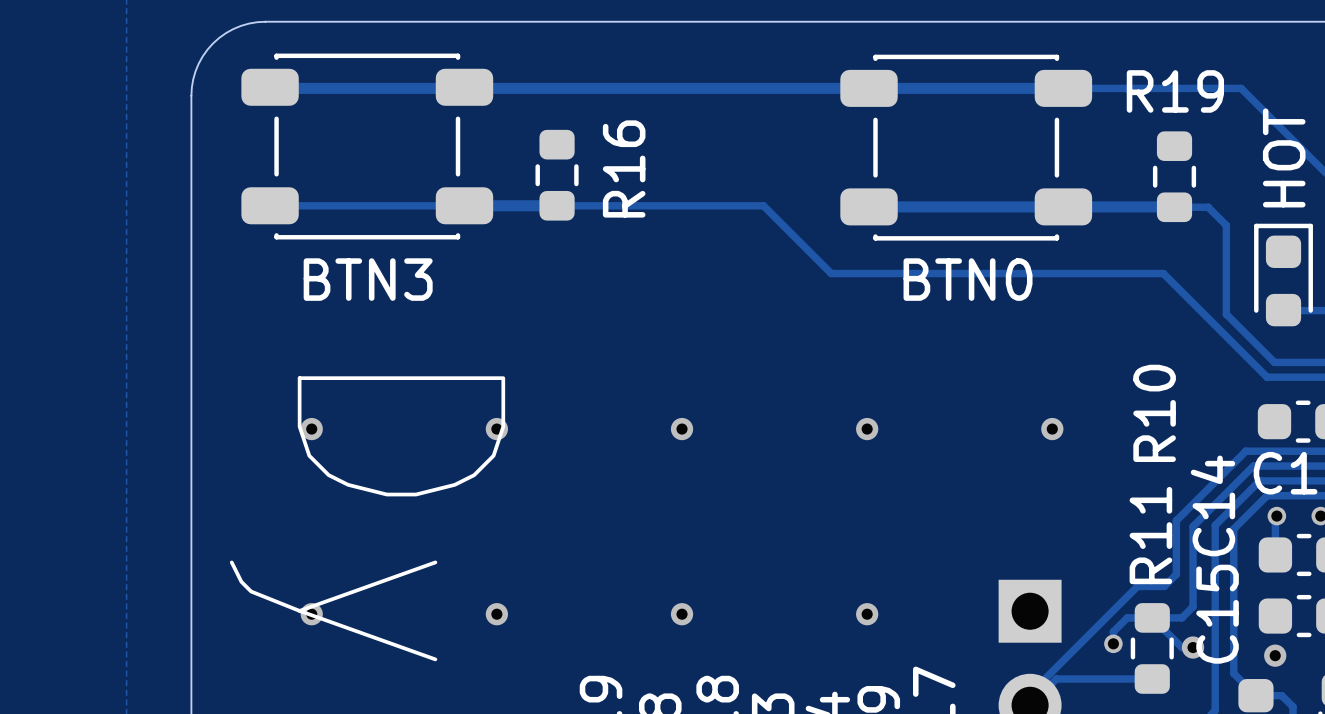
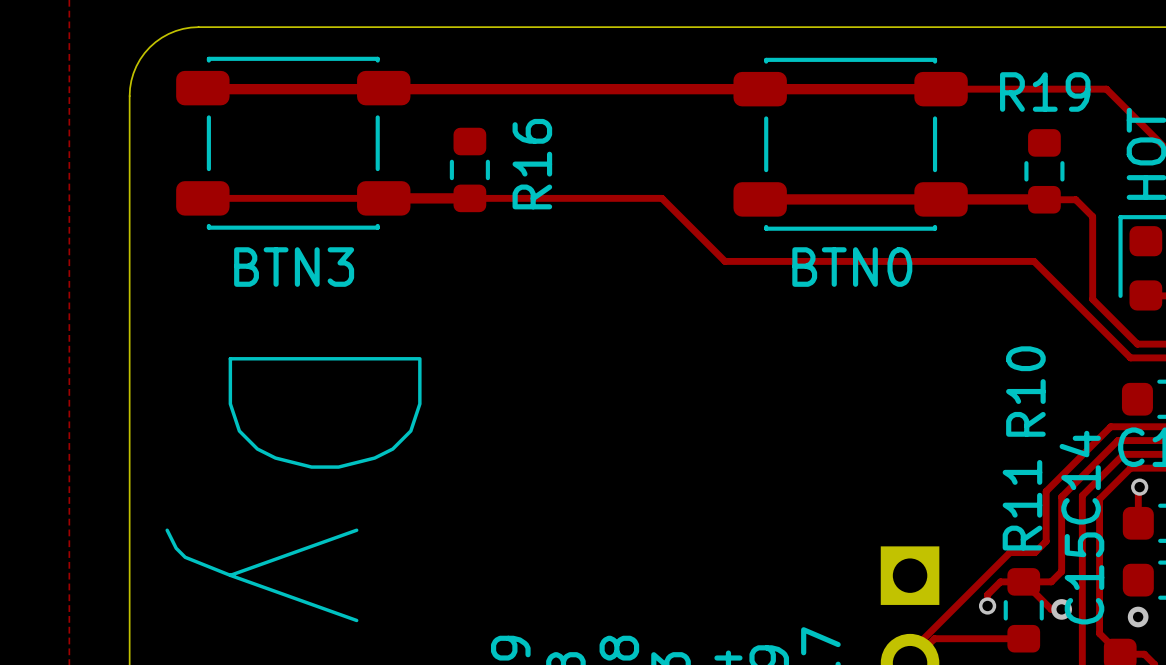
via: (311, 429) -> none
via: (496, 429) -> none
via: (682, 429) -> none
via: (867, 429) -> none
via: (1052, 429) -> none
via: (311, 614) -> none
via: (496, 614) -> none
via: (682, 614) -> none
via: (867, 614) -> none

